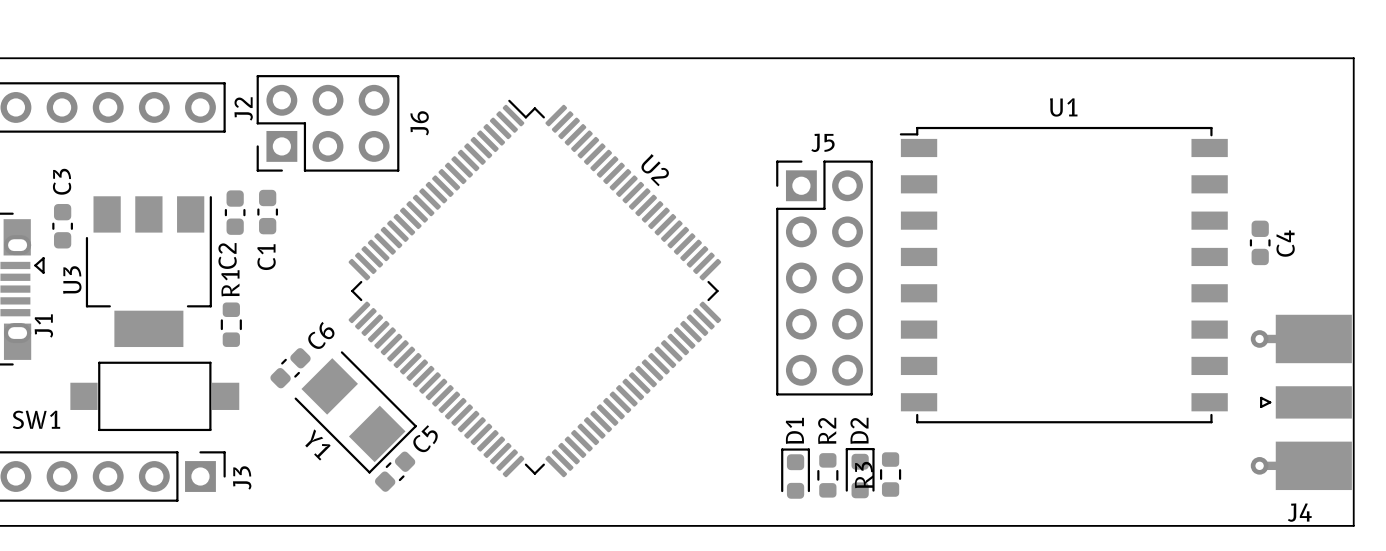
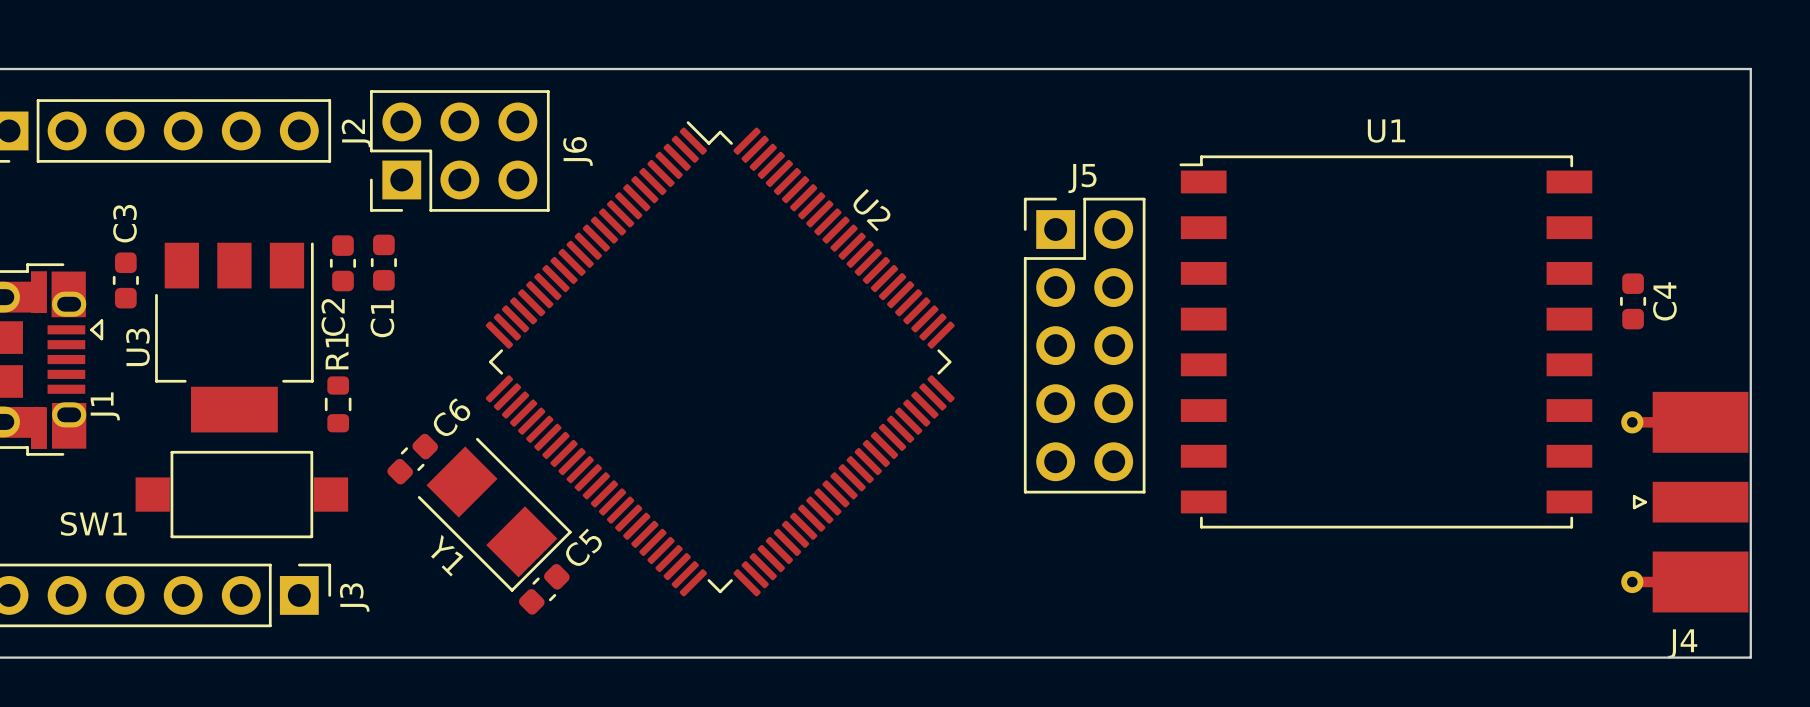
D1: (795, 473) -> none
D2: (860, 473) -> none
R3: (890, 474) -> none
R2: (827, 475) -> none

